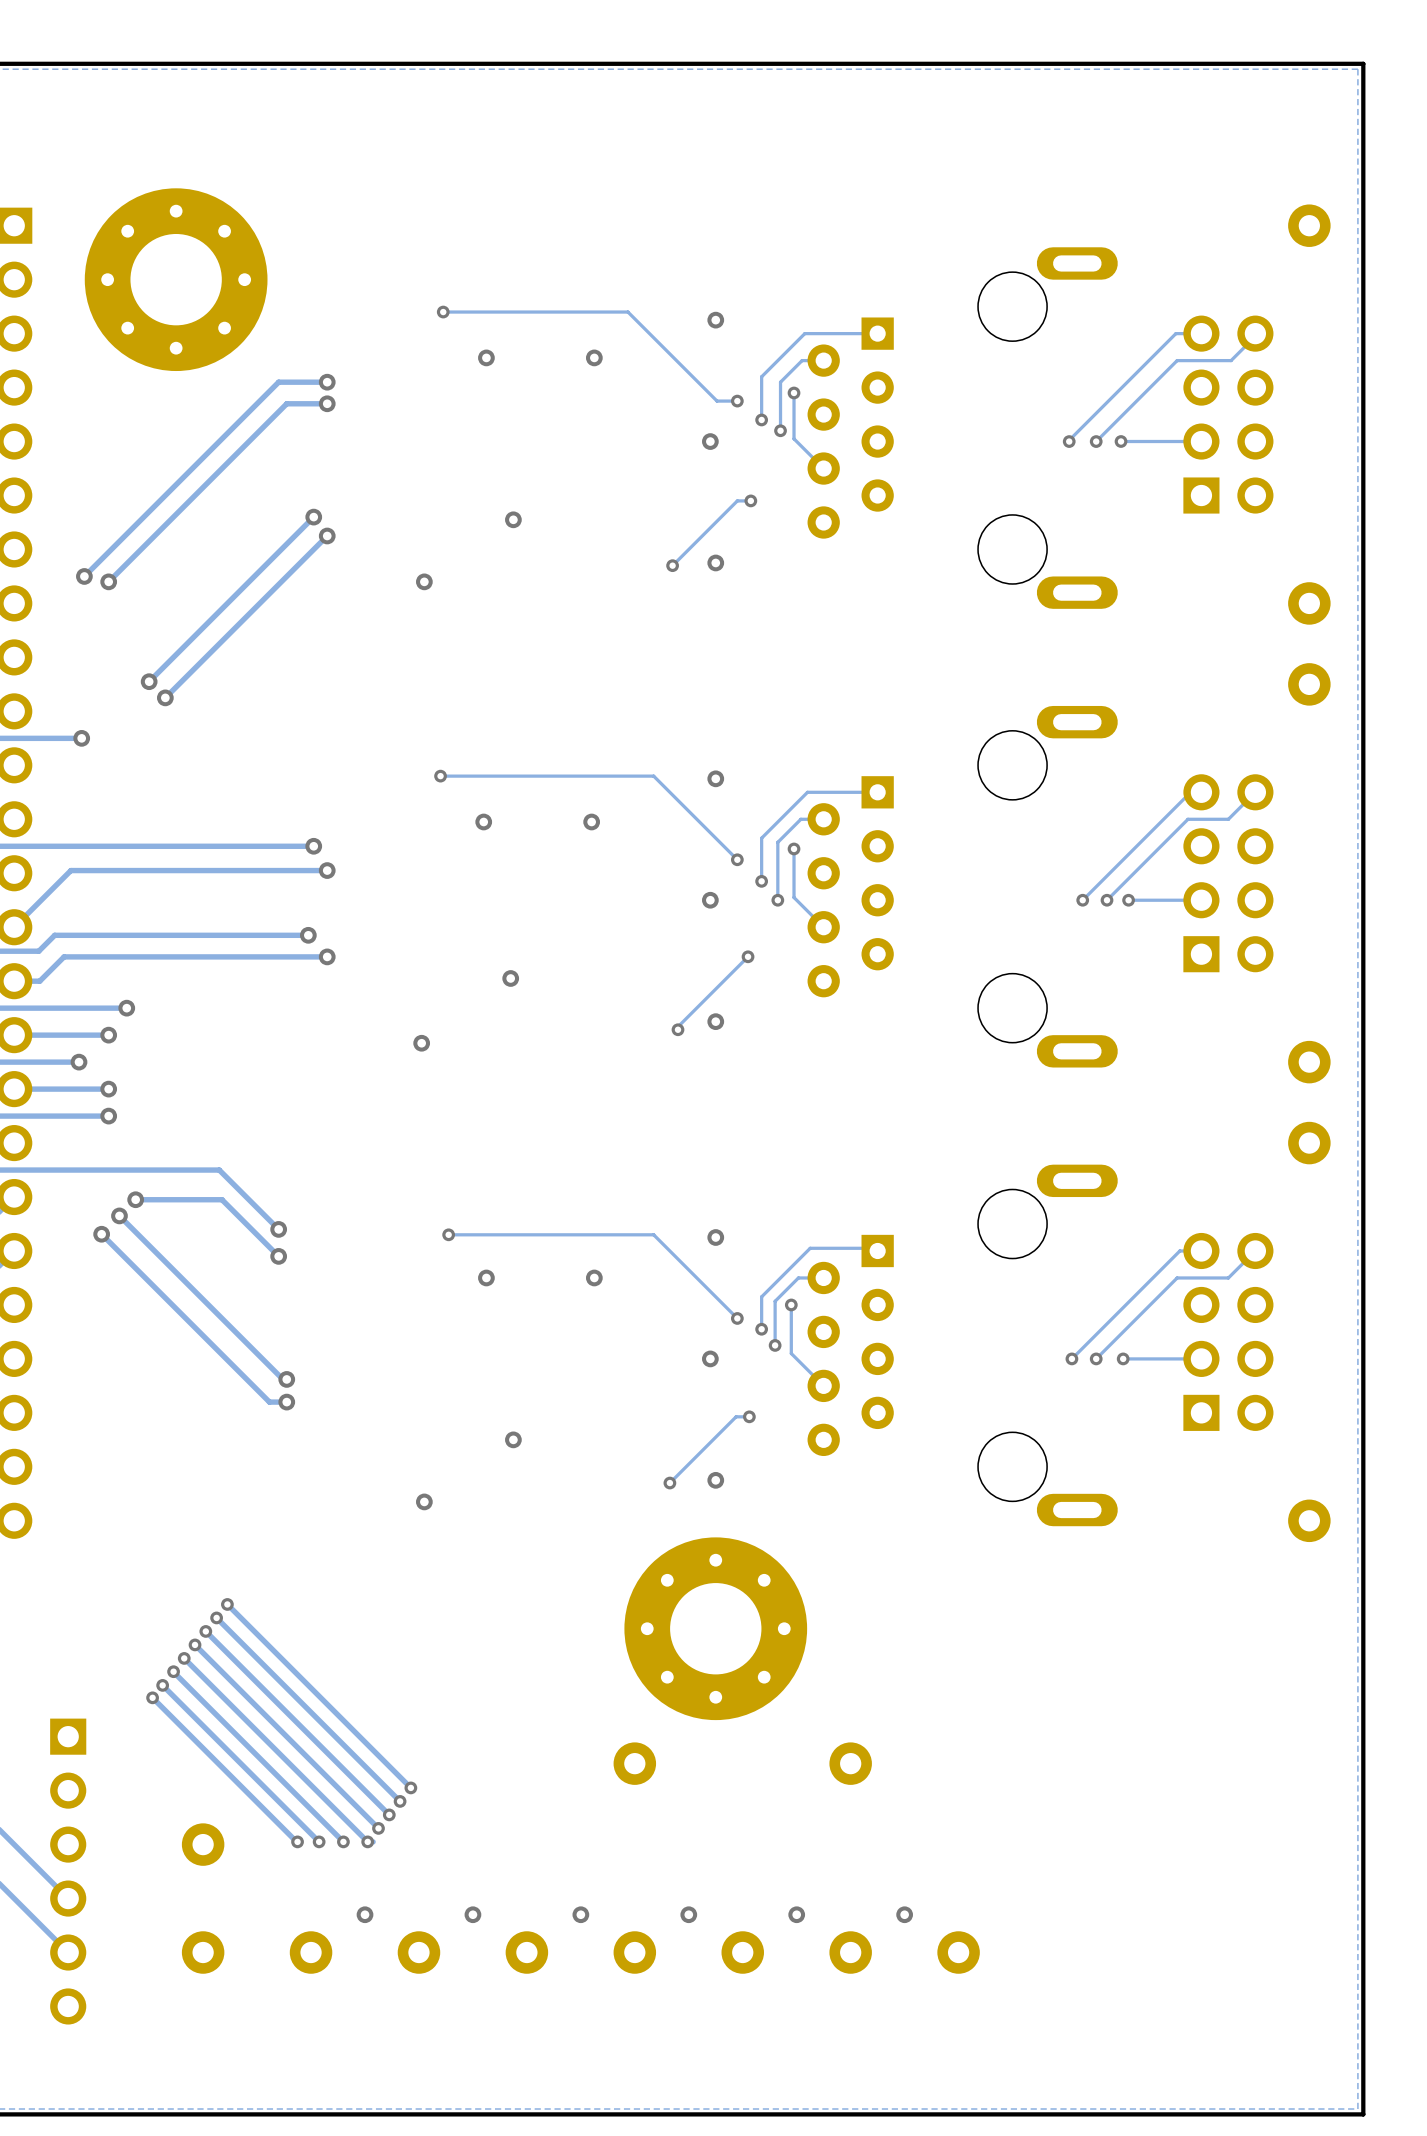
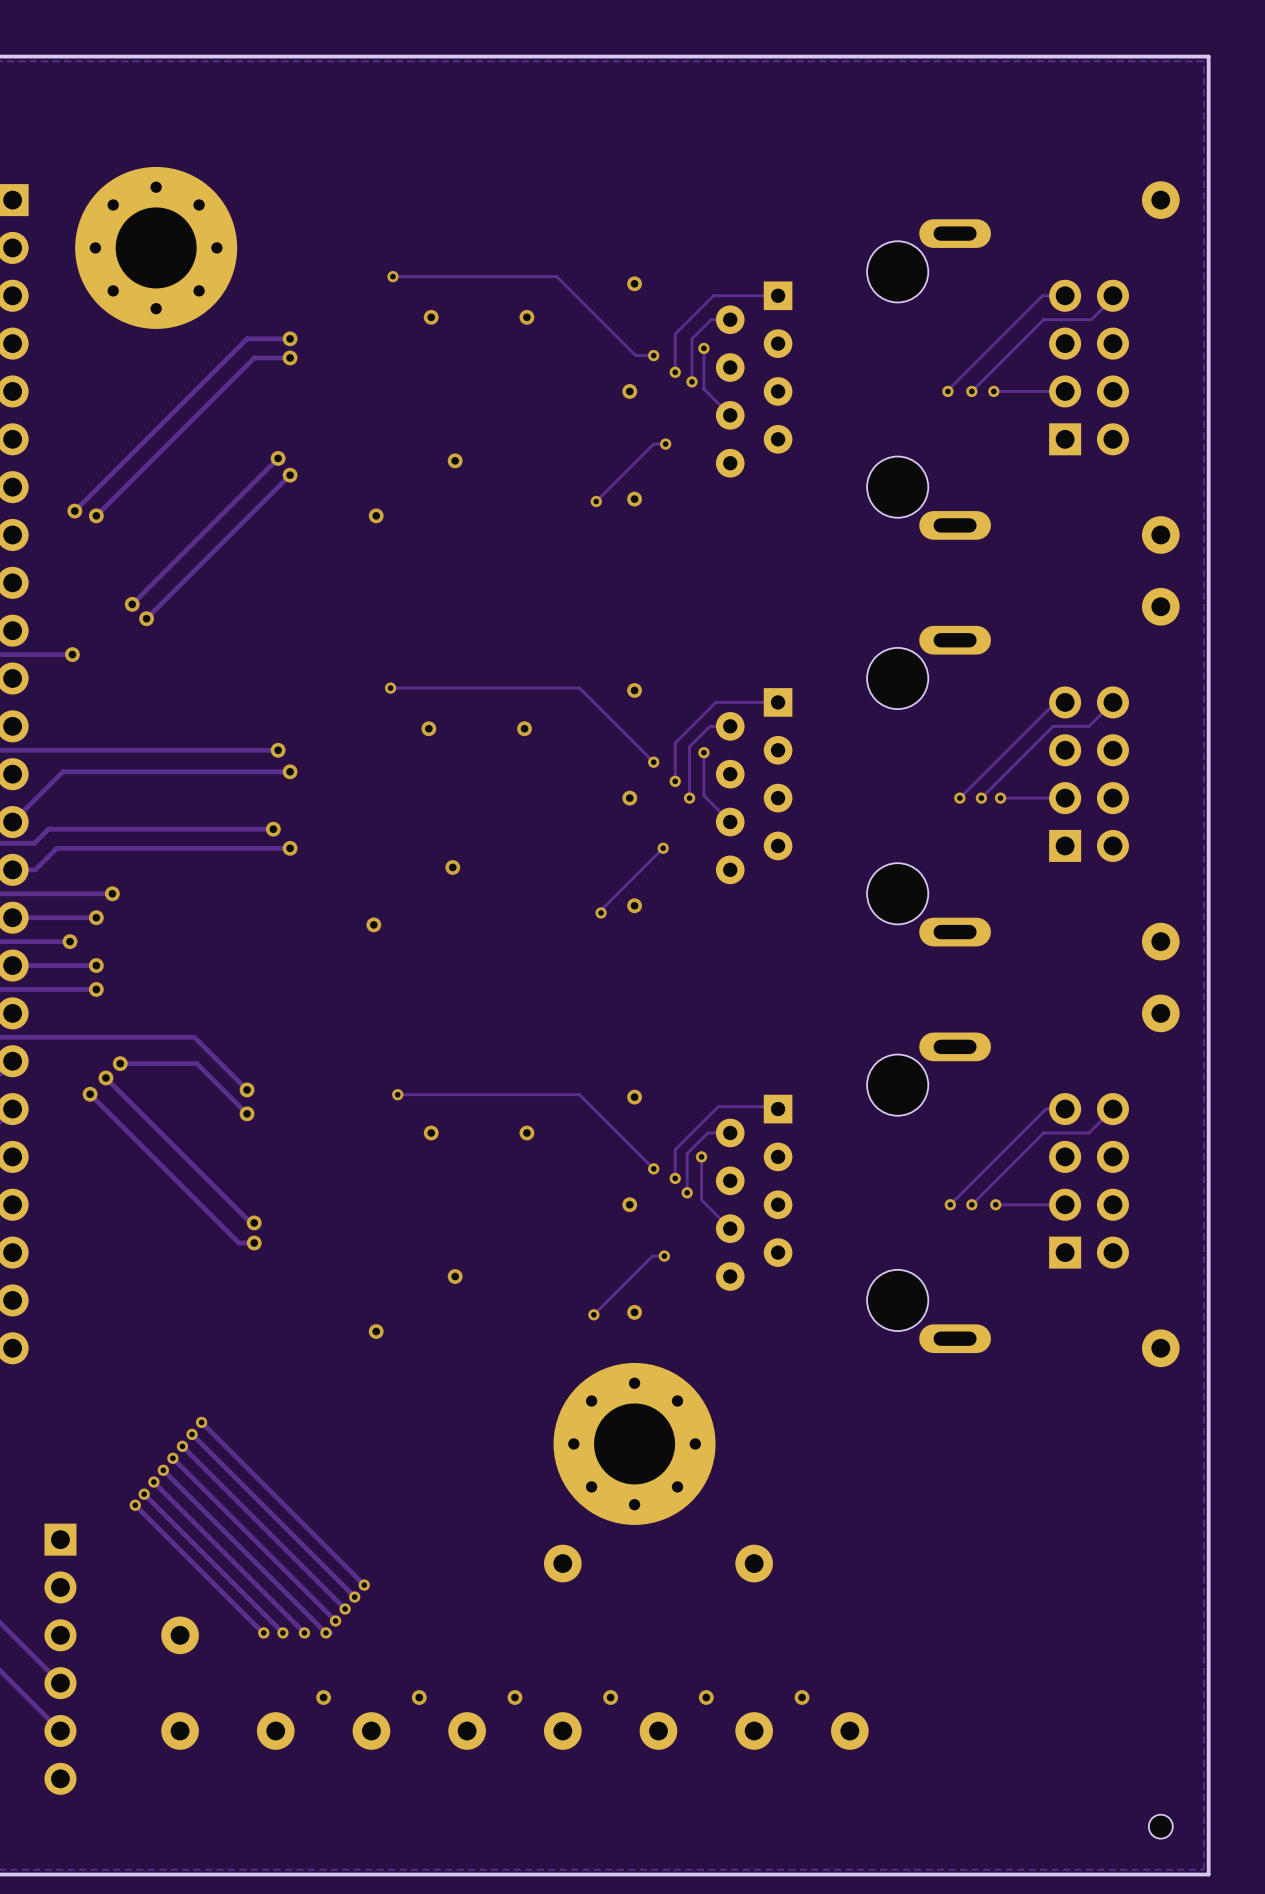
part: none -> (1160, 1826)

